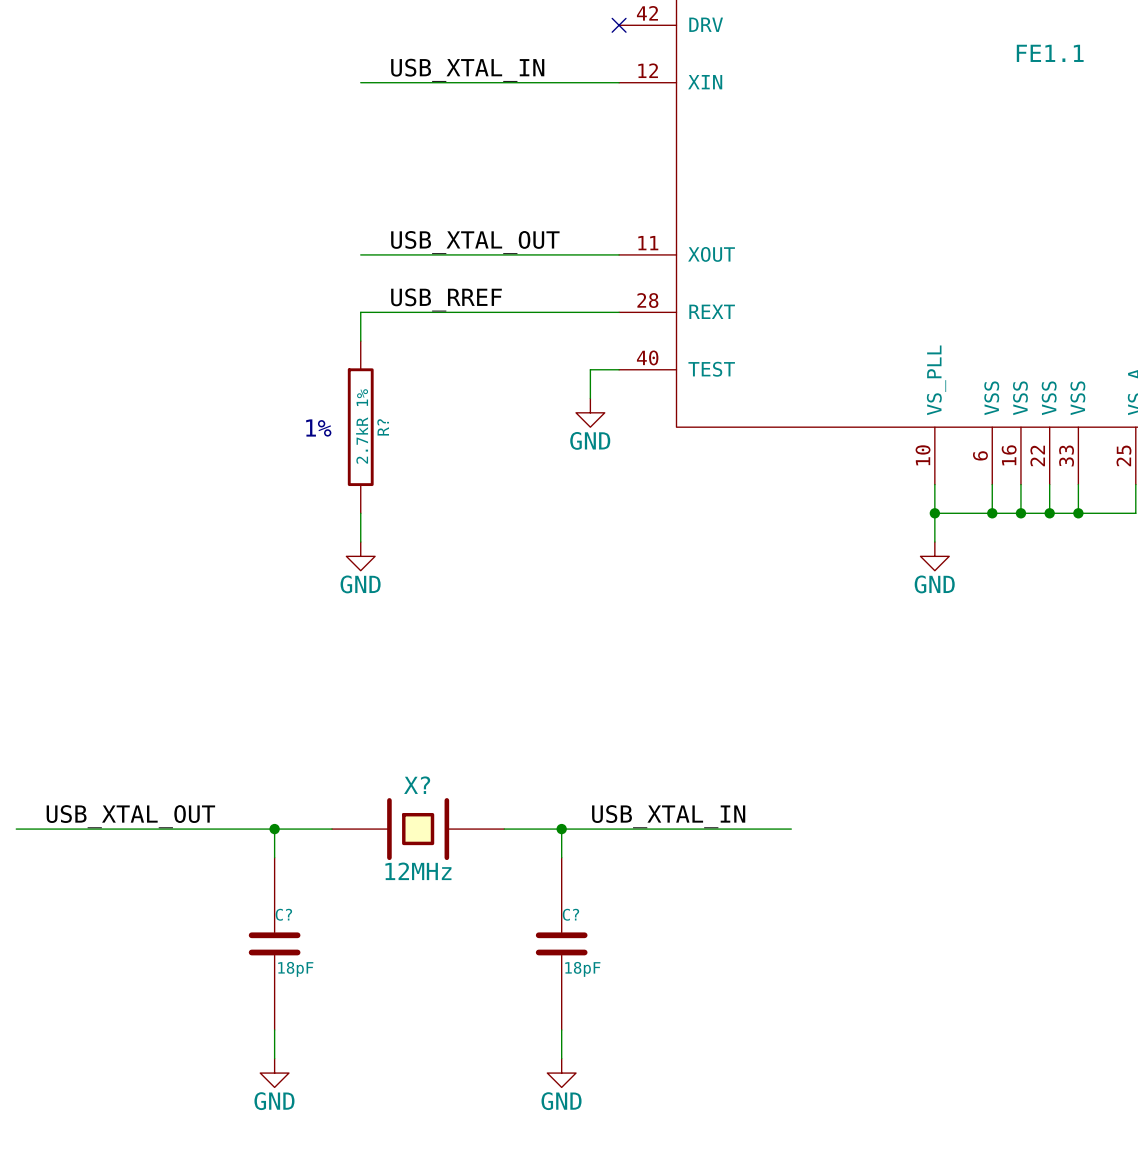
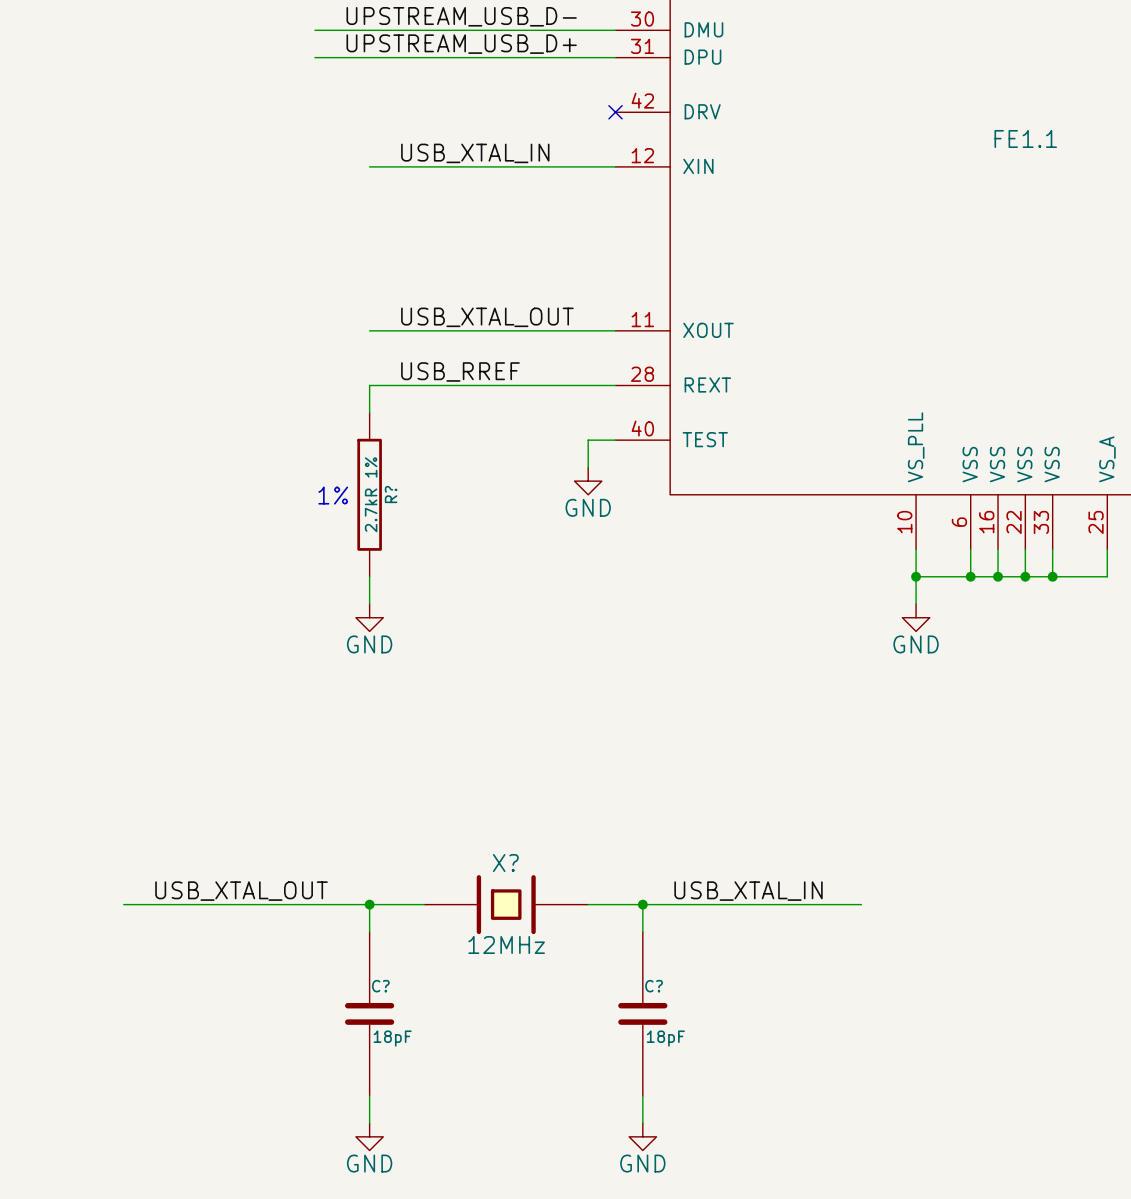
label position: USB_XTAL_OUT (130, 816) -> USB_XTAL_OUT (241, 891)
label position: USB_XTAL_IN (668, 816) -> USB_XTAL_IN (748, 891)
wire: (16, 829) (332, 829) -> (123, 904) (424, 904)
wire: (274, 829) (274, 857) -> (369, 904) (369, 931)
junction: (274, 829) -> none
X? position: (418, 829) -> (506, 904)
wire: (504, 829) (791, 829) -> (588, 904) (861, 904)
wire: (561, 829) (561, 857) -> (642, 904) (642, 931)
junction: (561, 829) -> none
junction: none -> (369, 904)
junction: none -> (642, 904)
C? position: (274, 943) -> (369, 1013)
C? position: (561, 943) -> (642, 1013)
wire: (274, 1030) (274, 1058) -> (369, 1095) (369, 1123)
wire: (561, 1030) (561, 1058) -> (642, 1095) (642, 1123)
power symbol position: GND (274, 1073) -> GND (369, 1136)
power symbol position: GND (561, 1073) -> GND (642, 1136)

